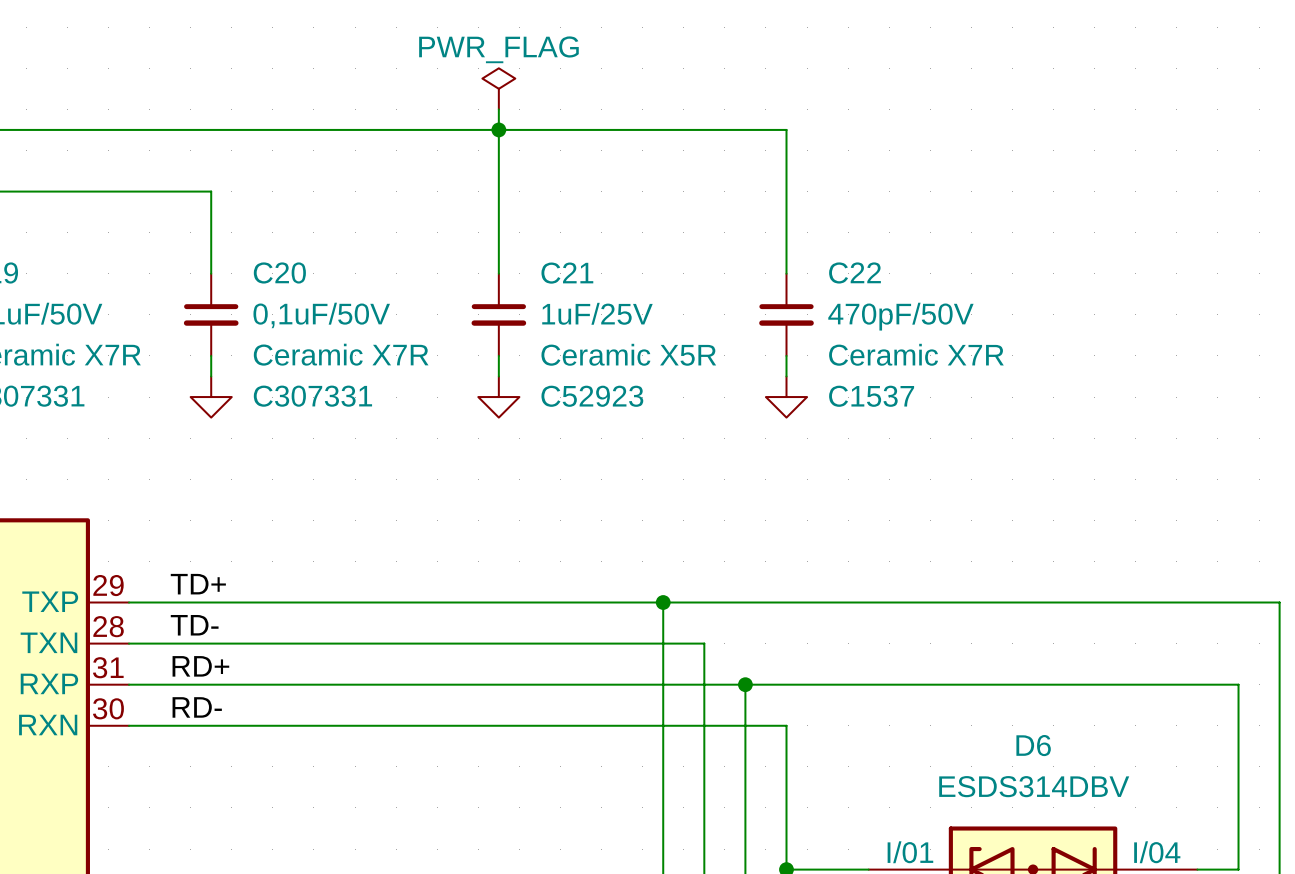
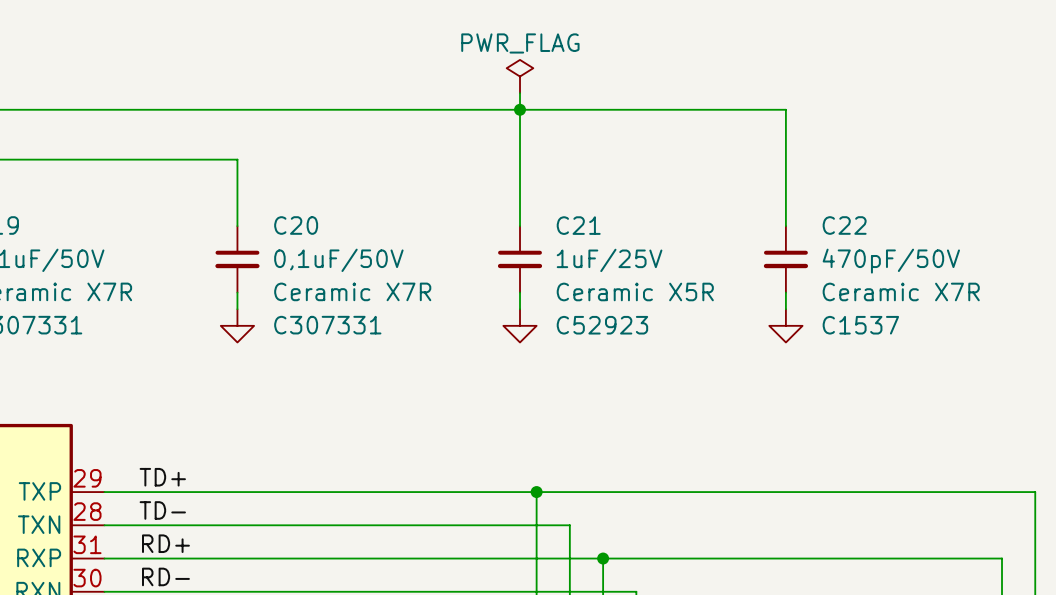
power symbol position: PWR_FLAG (498, 88) -> PWR_FLAG (520, 76)
wire: (498, 109) (498, 273) -> (520, 93) (520, 226)
junction: (498, 129) -> none
junction: none -> (520, 109)
wire: (786, 129) (786, 273) -> (636, 109) (785, 109) (785, 226)
wire: (211, 191) (211, 273) -> (170, 159) (237, 159) (237, 226)
C20 position: (211, 314) -> (237, 259)
C21 position: (498, 314) -> (520, 259)
C22 position: (786, 314) -> (785, 259)
wire: (211, 355) (211, 376) -> (237, 292) (237, 309)
wire: (498, 355) (498, 376) -> (520, 292) (520, 309)
wire: (786, 355) (786, 376) -> (785, 292) (785, 309)
power symbol position: (211, 397) -> (237, 325)
power symbol: (498, 397) -> none
power symbol: none -> (520, 325)
power symbol: (786, 397) -> none
power symbol: none -> (785, 325)

